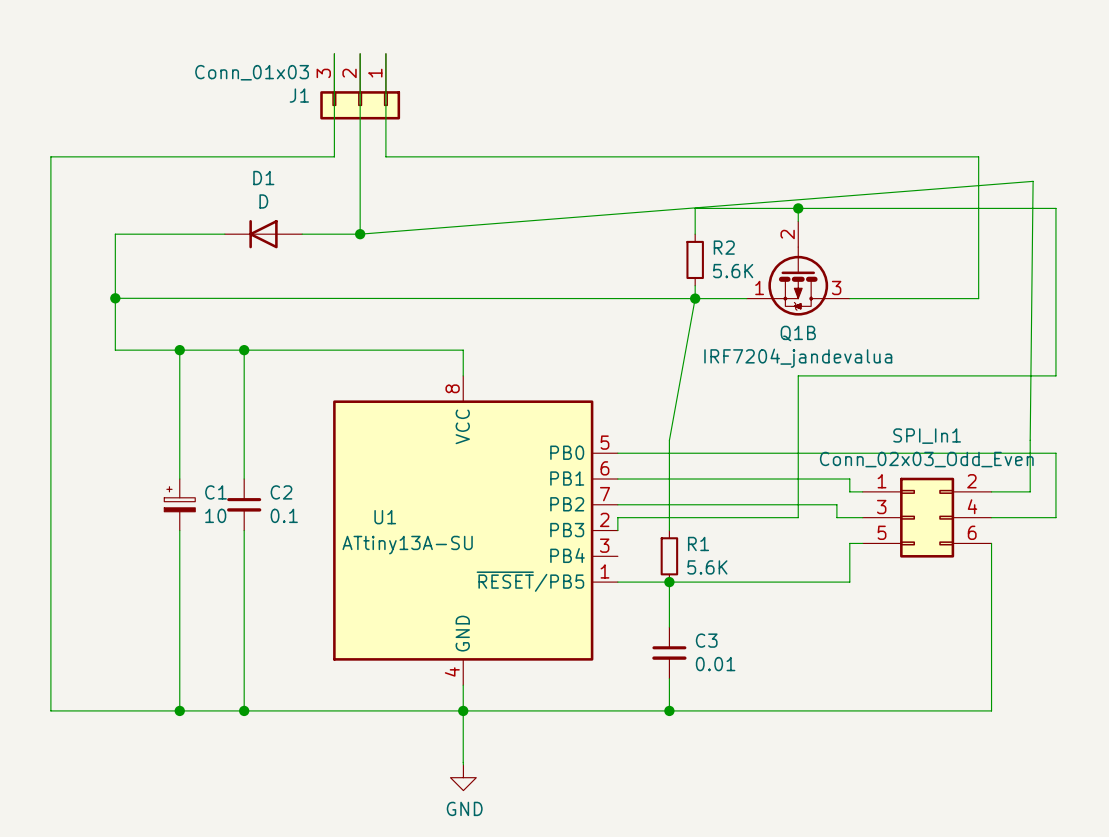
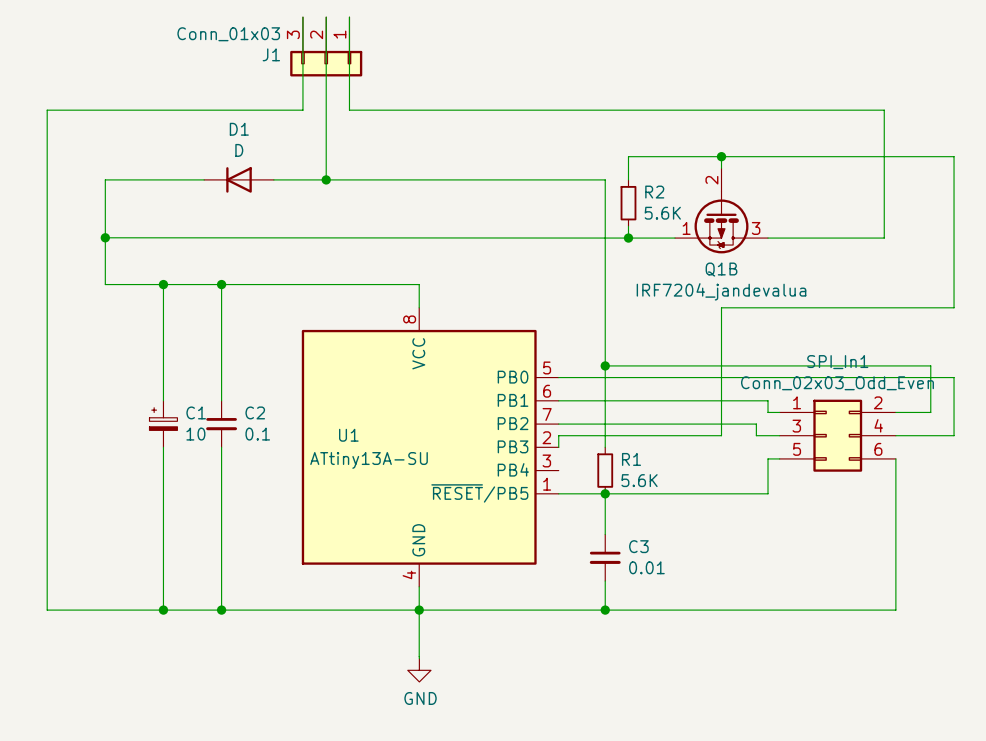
wire: (360, 234) (1033, 181) (1030, 440) -> (326, 179) (605, 179) (605, 365) (930, 365)
wire: (695, 298) (669, 440) -> none
junction: none -> (605, 365)

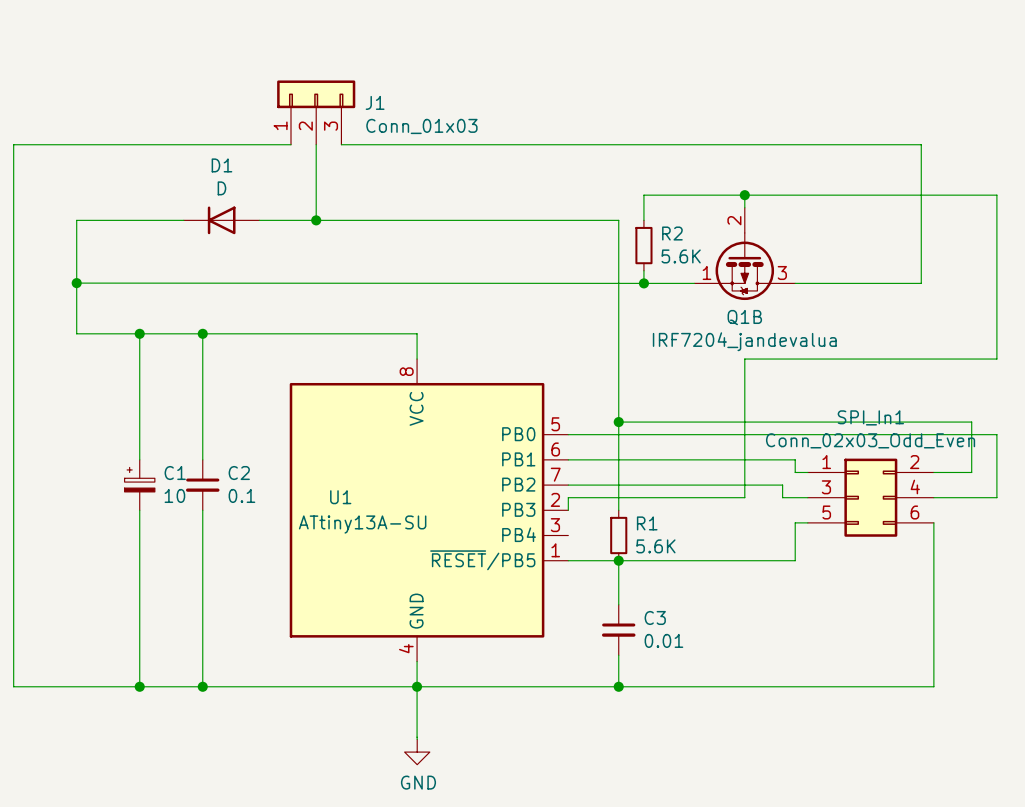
J1 rotation: 0° (326, 63) -> 180° (316, 94)

